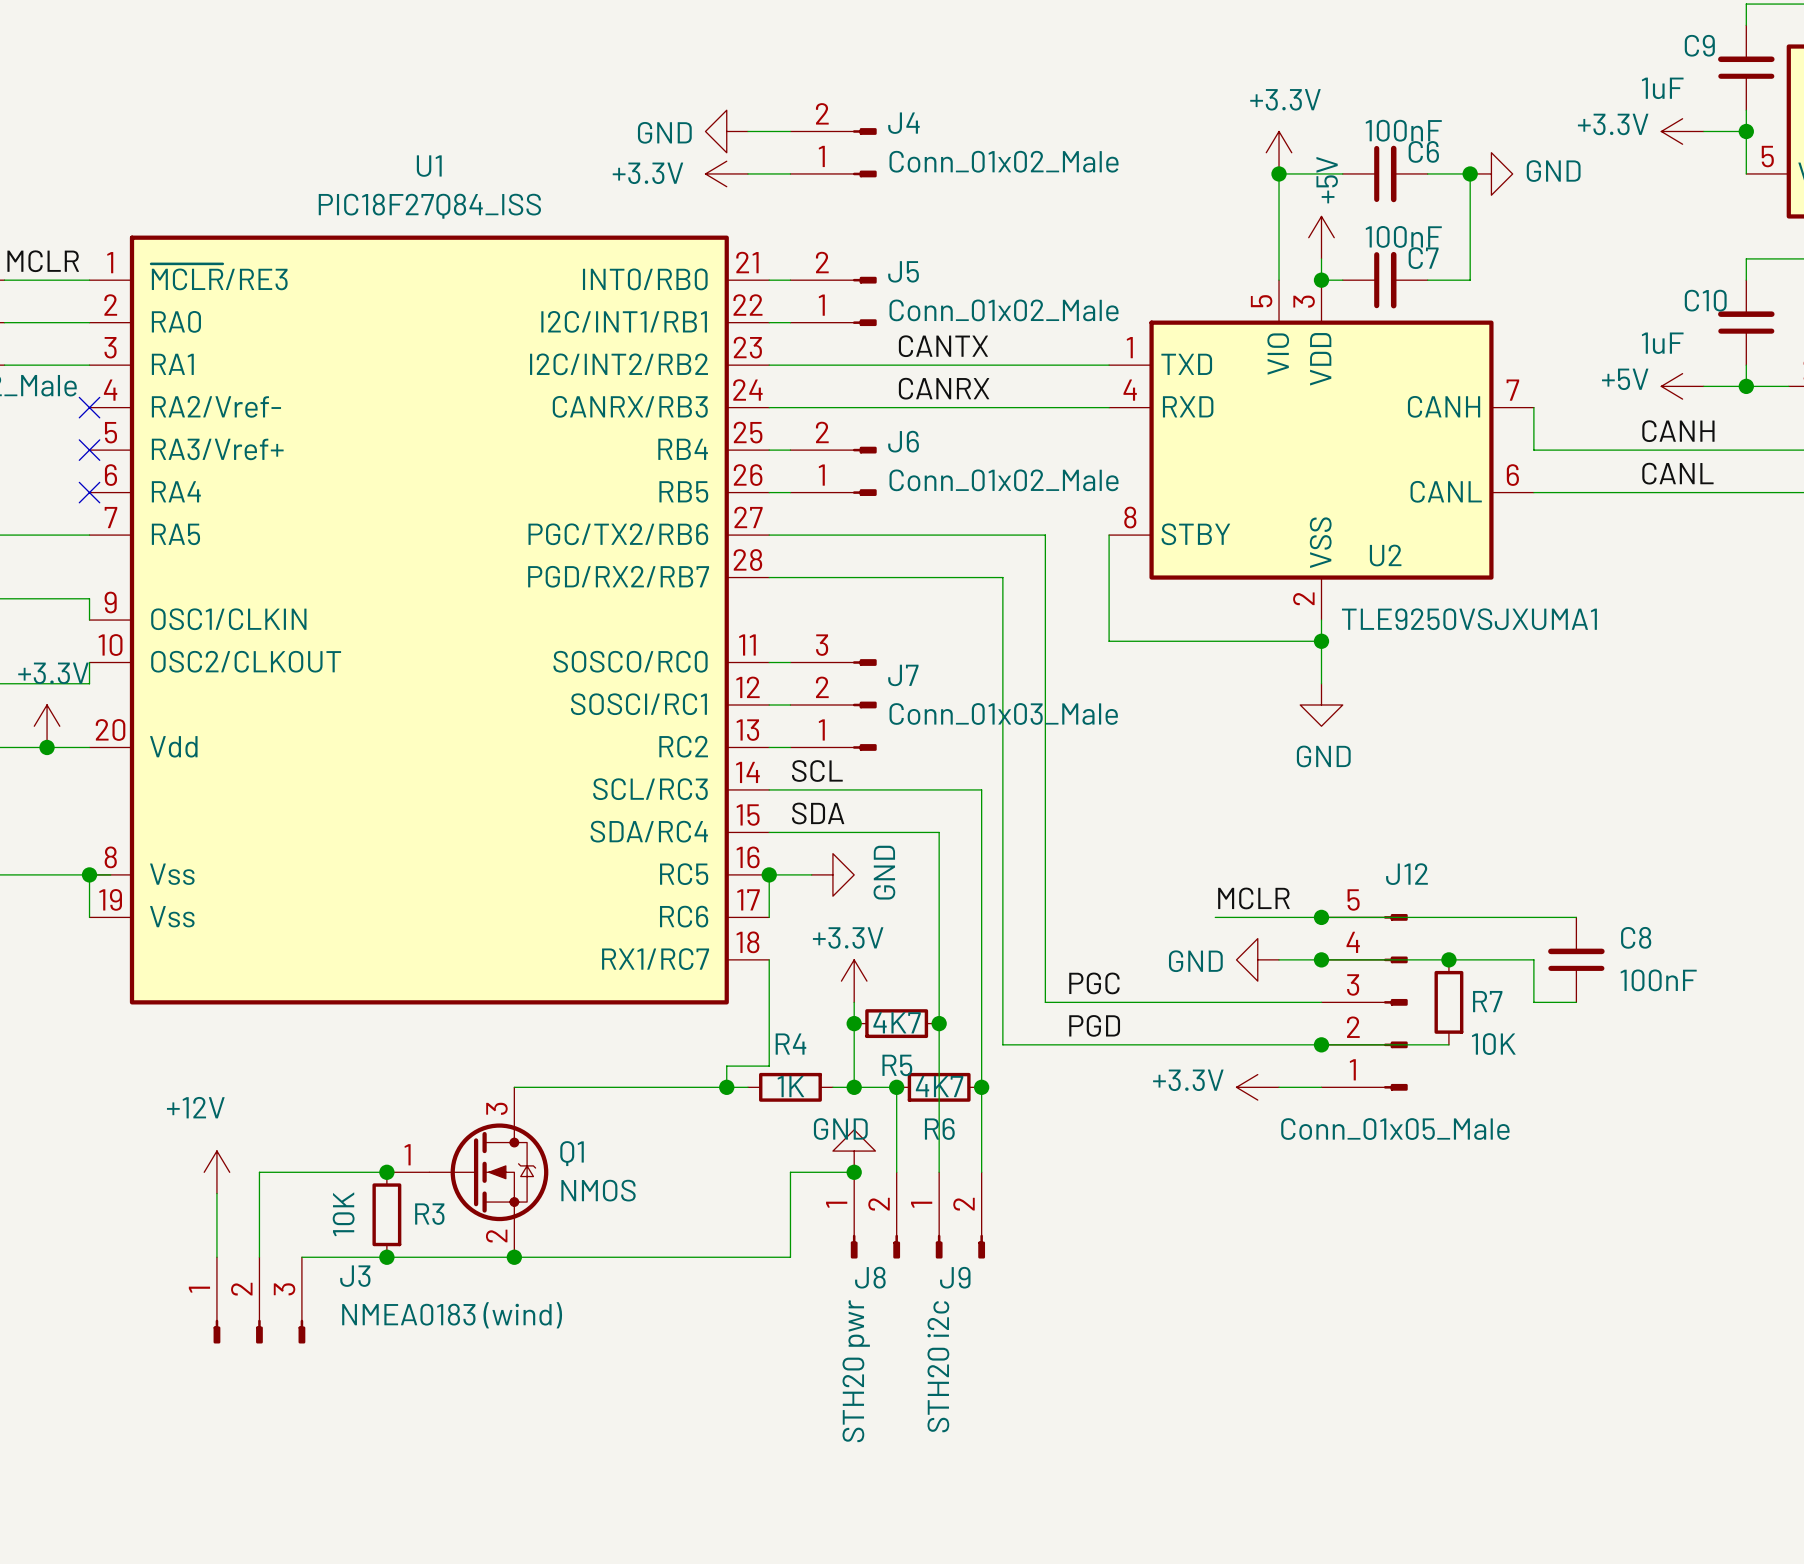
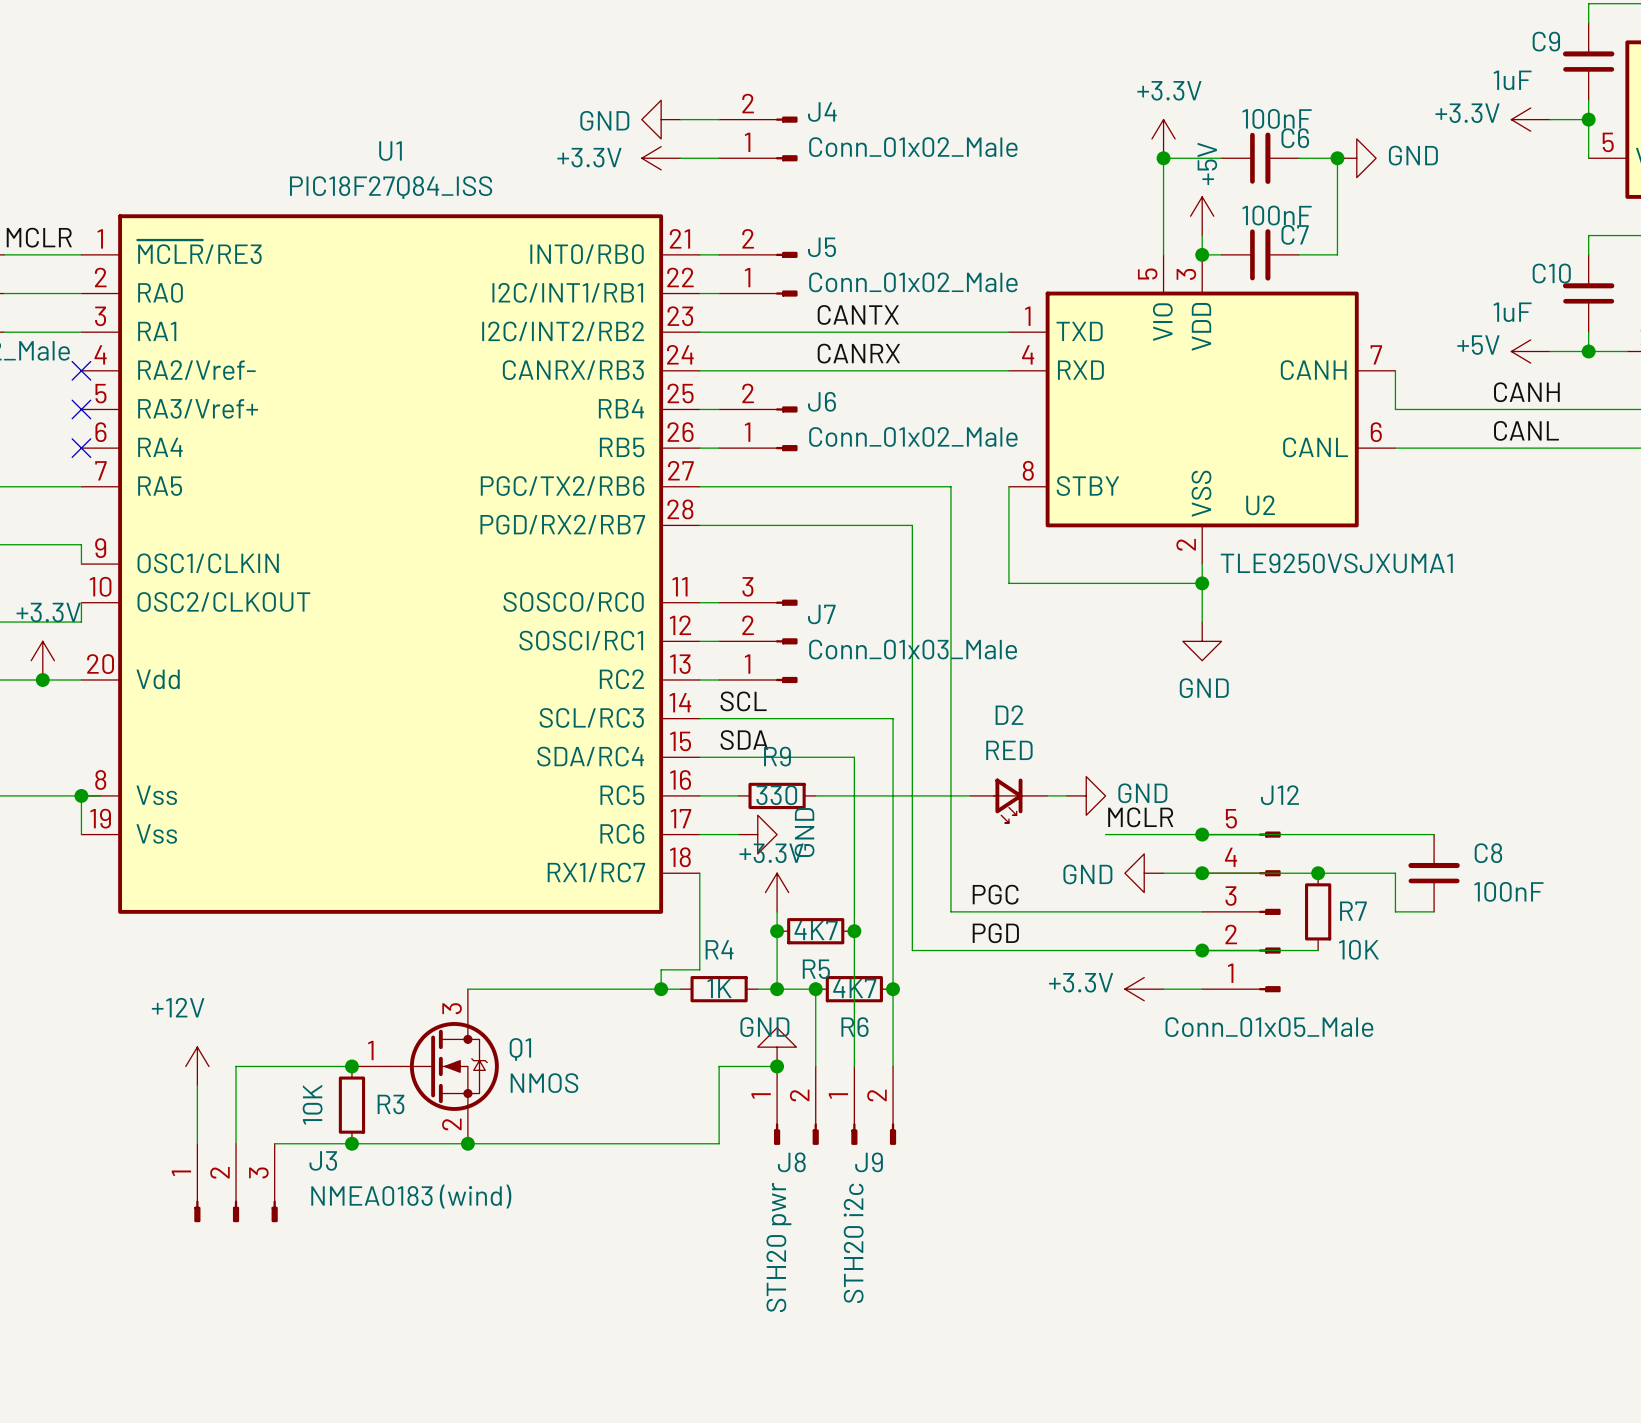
wire: (769, 874) (769, 917) -> (738, 834) (699, 834)
junction: (769, 874) -> none
power symbol position: GND (832, 874) -> GND (757, 834)
R9: none -> 330 (777, 795)
wire: none -> (815, 795) (970, 795)
wire: none -> (1047, 795) (1066, 795)
power symbol: none -> GND (1086, 795)
D2: none -> RED (1008, 800)

